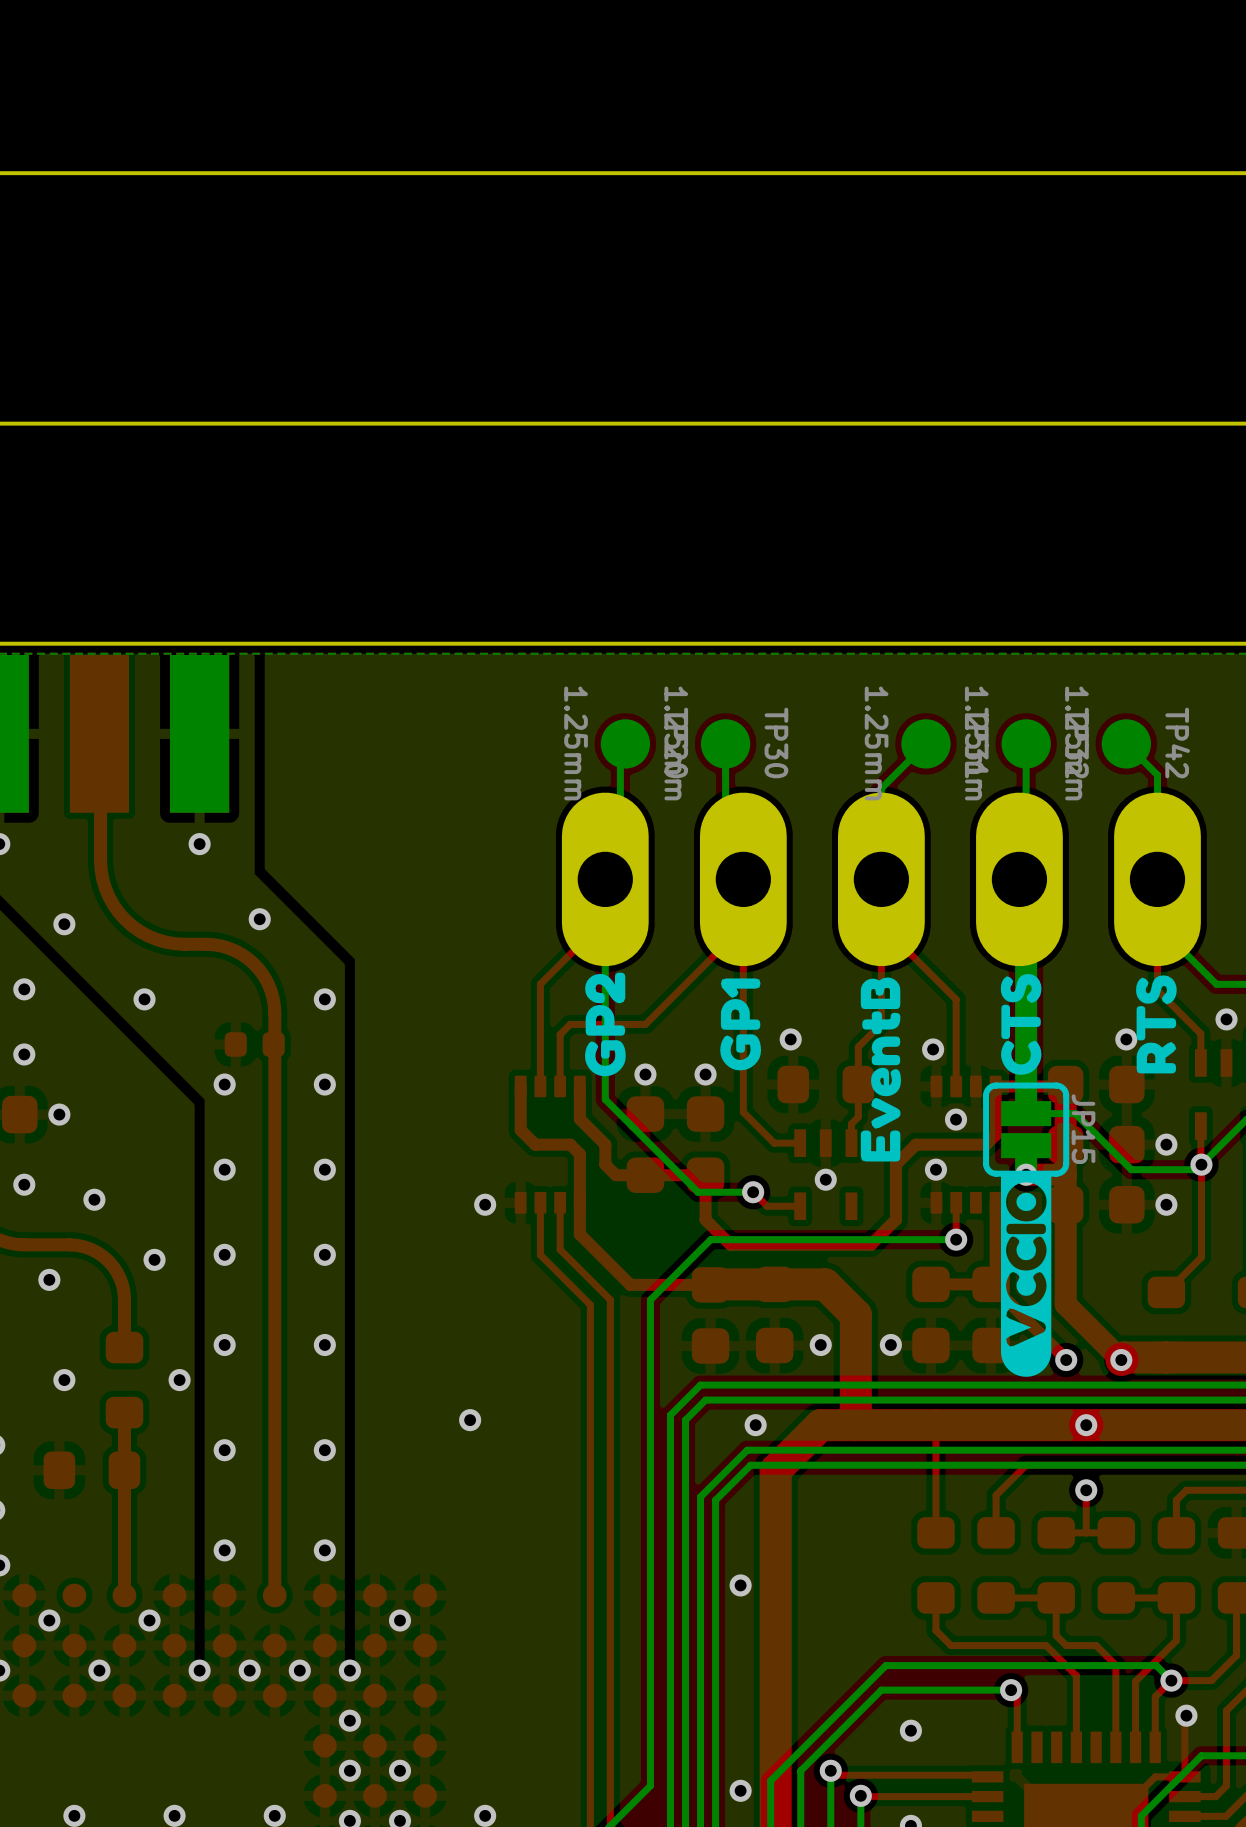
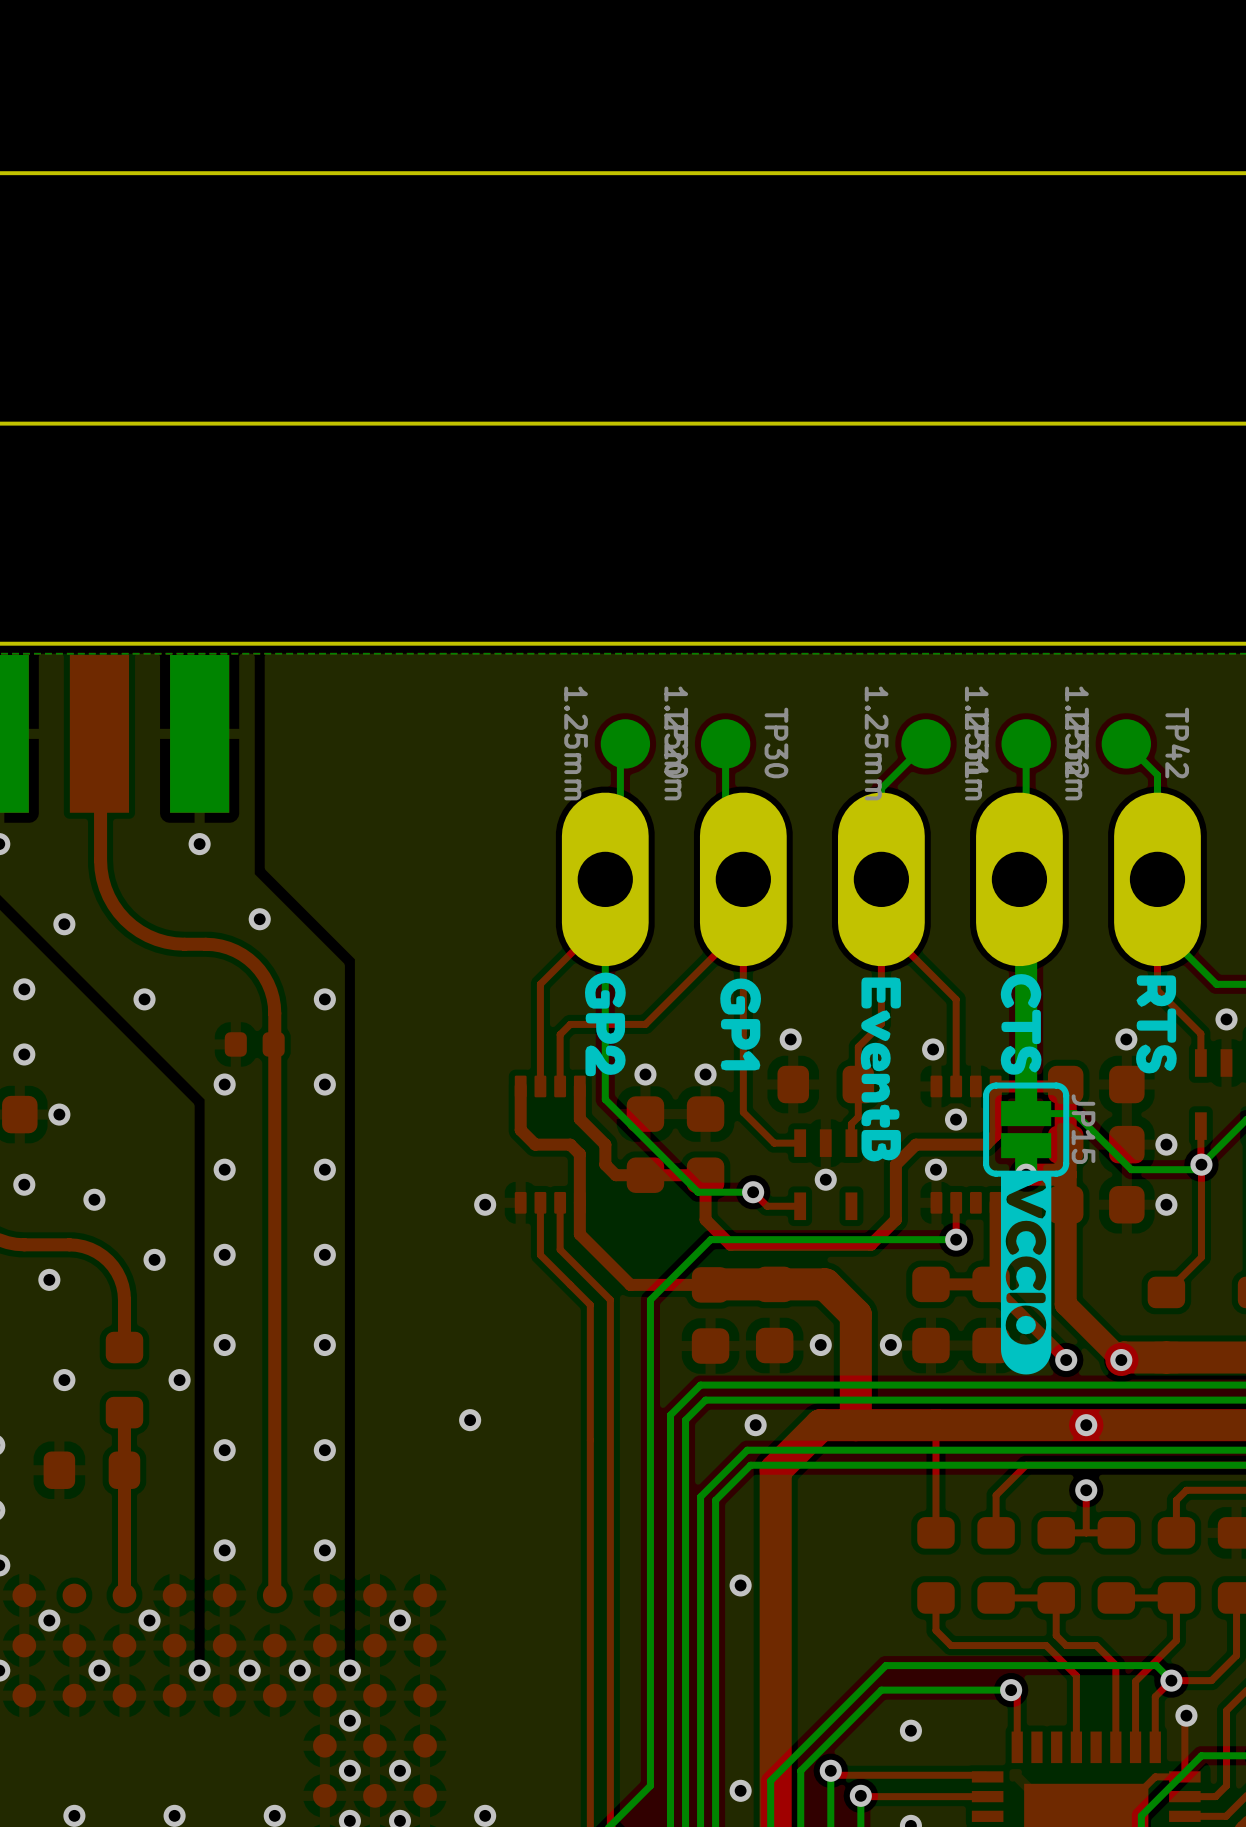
drawing shape: [585, 972, 626, 1077] -> [585, 972, 626, 1077]
drawing shape: [1000, 974, 1042, 1075] -> [1000, 974, 1042, 1075]
drawing shape: [1136, 975, 1177, 1074] -> [1136, 975, 1177, 1074]
drawing shape: [860, 977, 901, 1162] -> [860, 977, 901, 1162]
drawing shape: [720, 978, 761, 1071] -> [720, 978, 761, 1071]
drawing shape: [1000, 1172, 1052, 1377] -> [1000, 1175, 1052, 1375]

